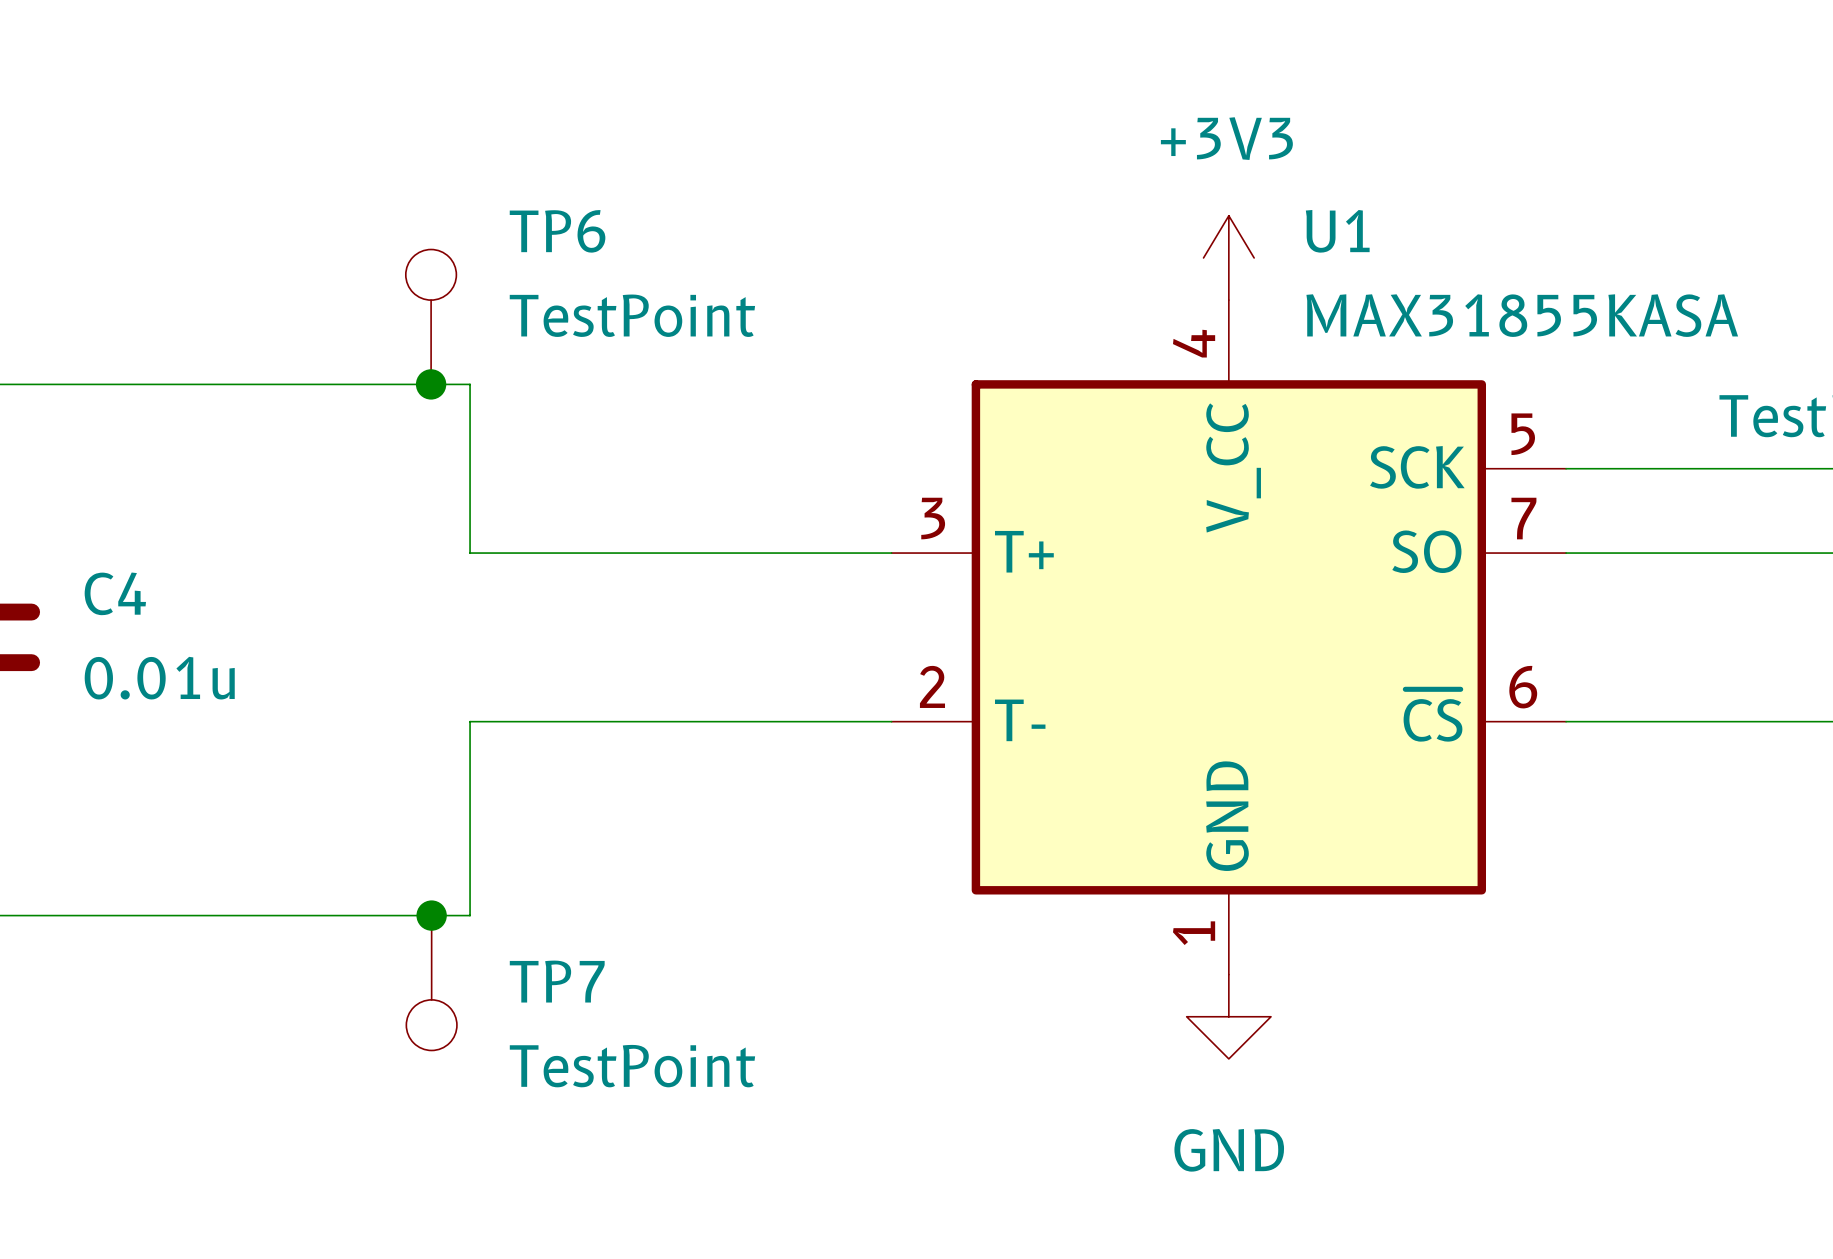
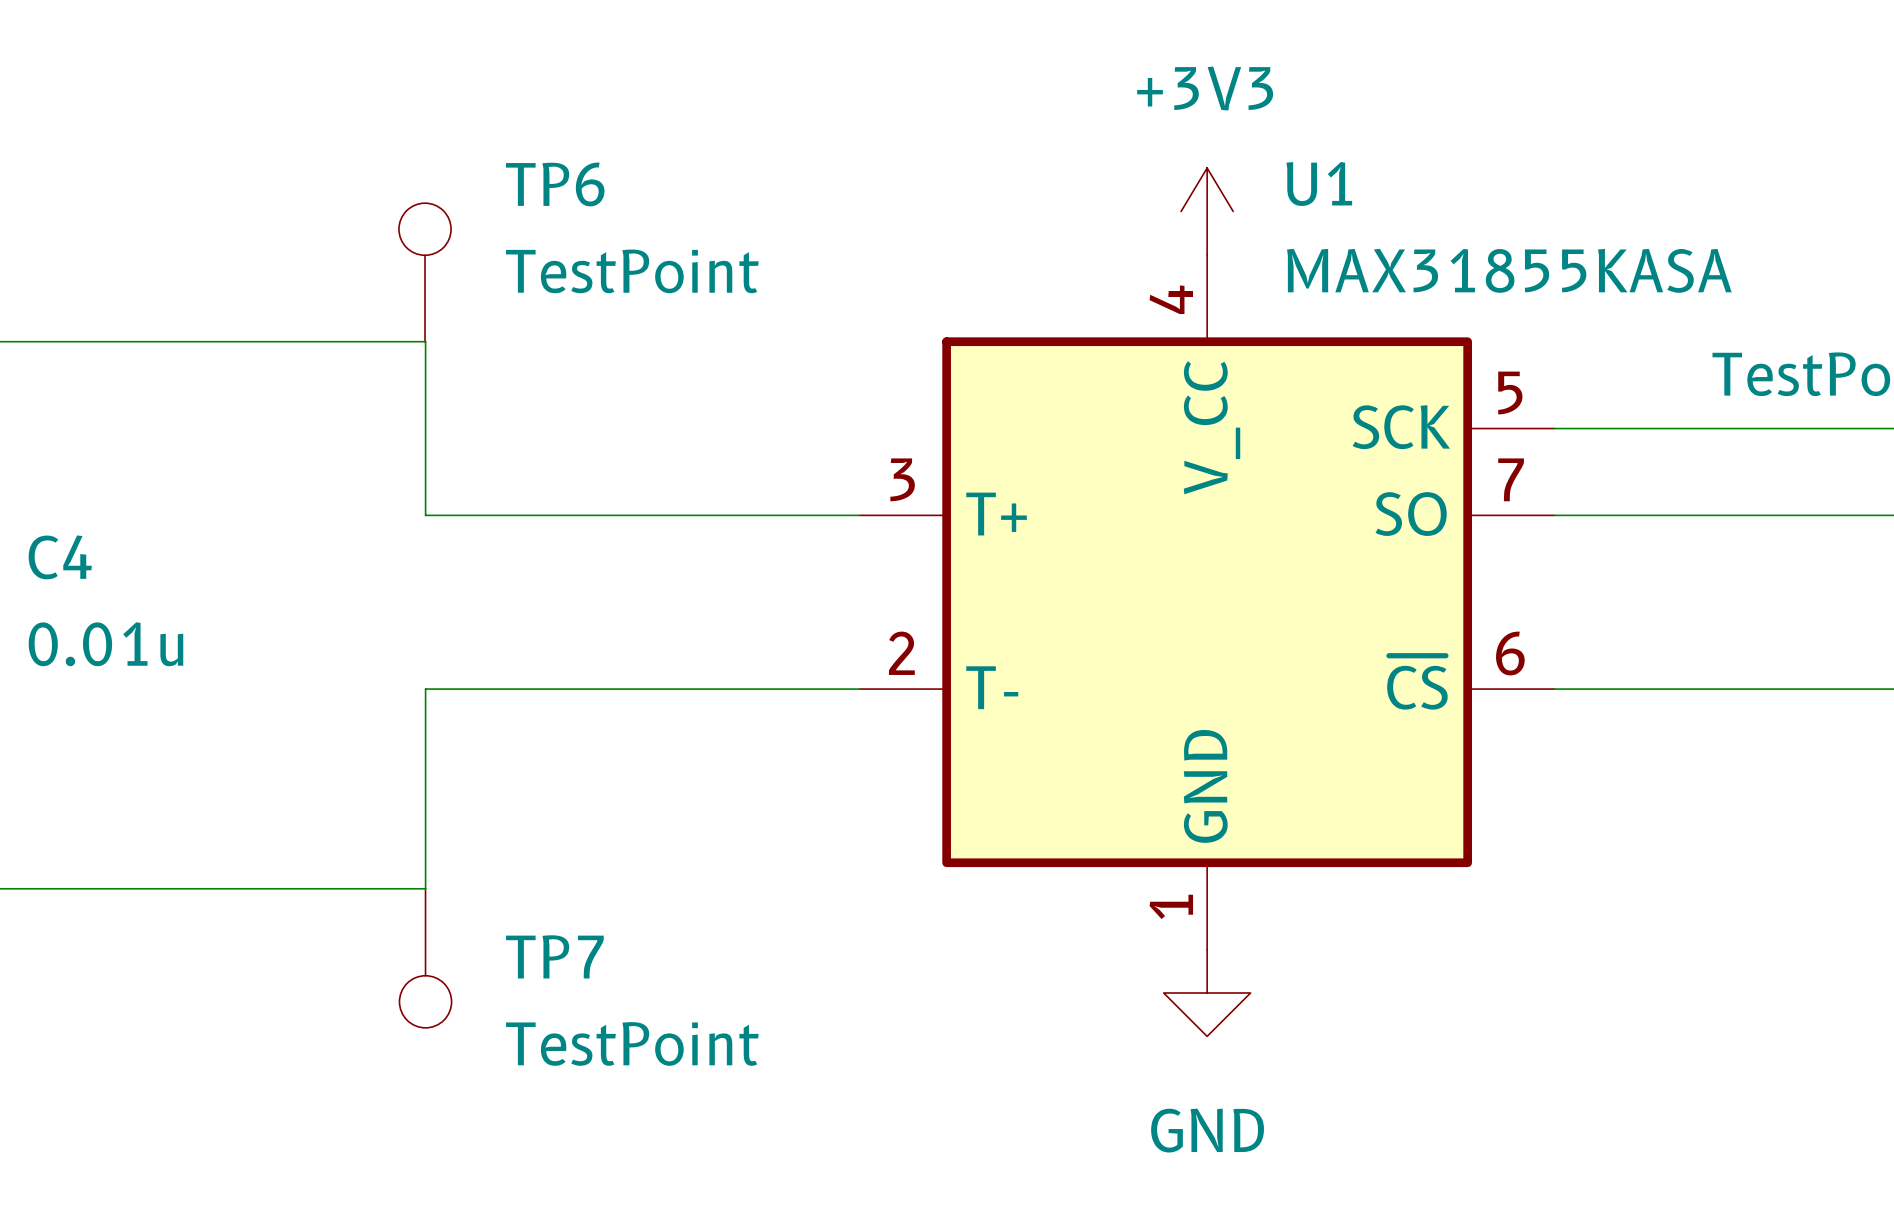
TP6 position: (431, 316) -> (425, 272)
junction: (431, 384) -> none
junction: (431, 915) -> none
TP7 position: (431, 983) -> (425, 958)

